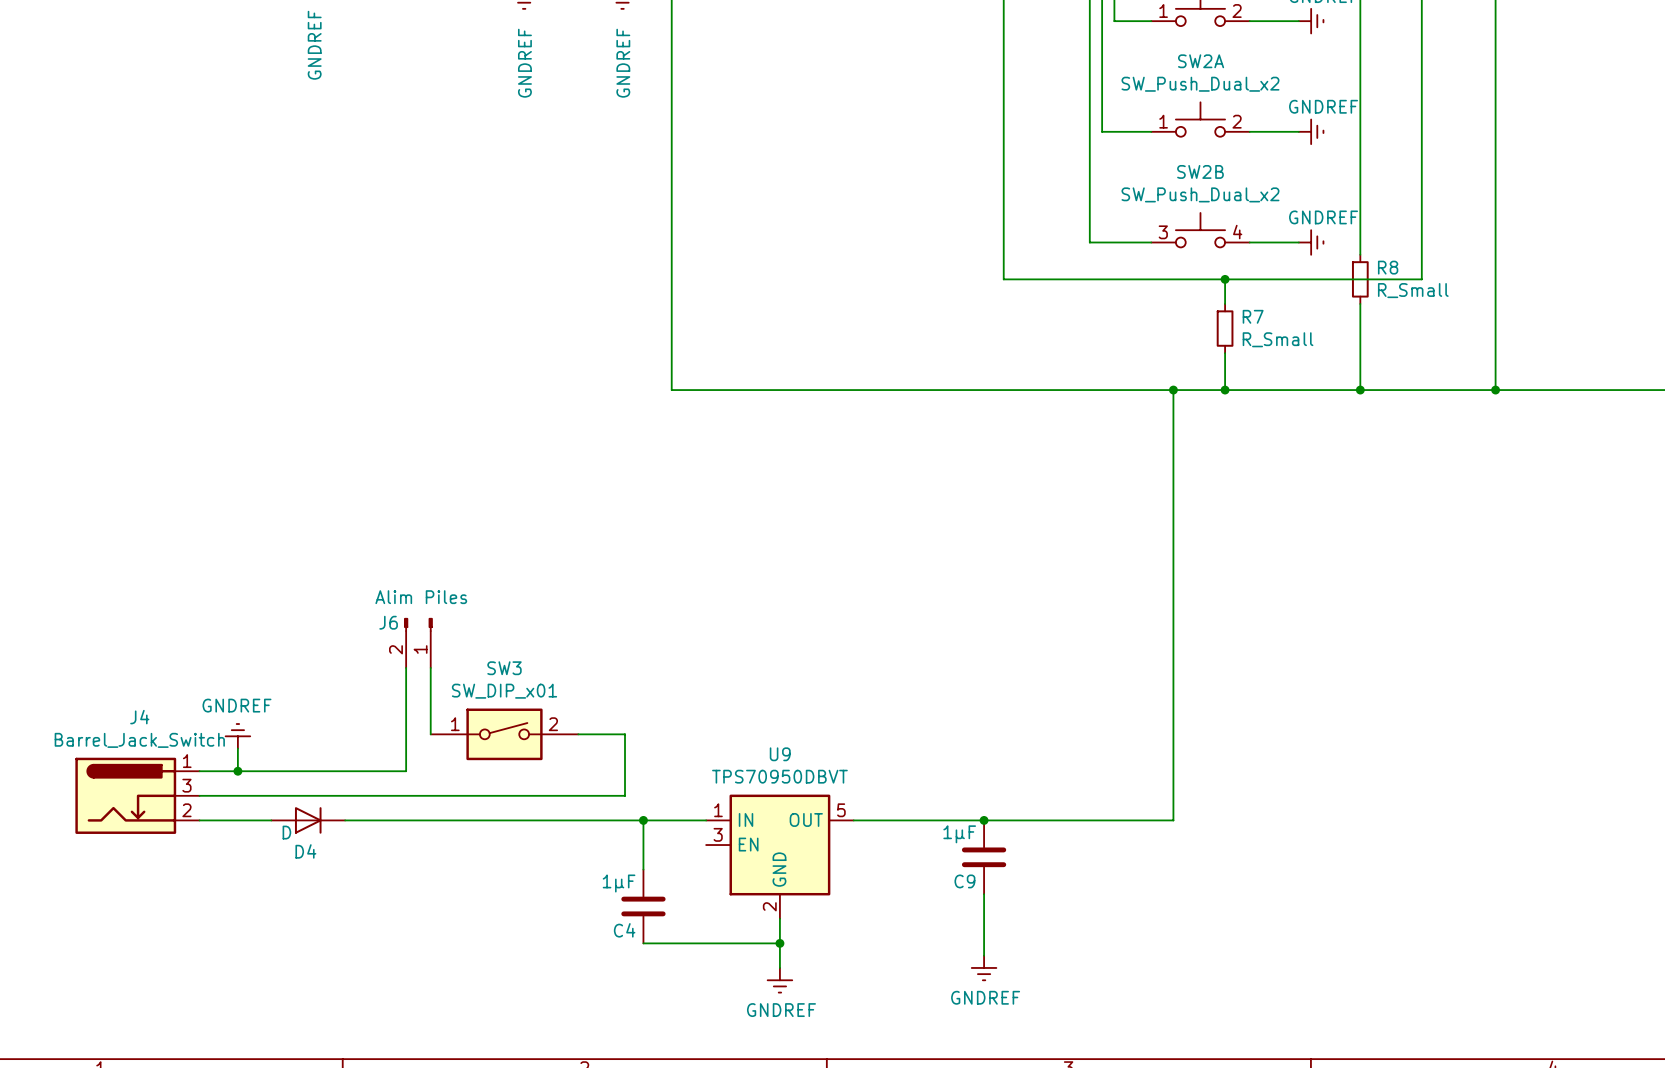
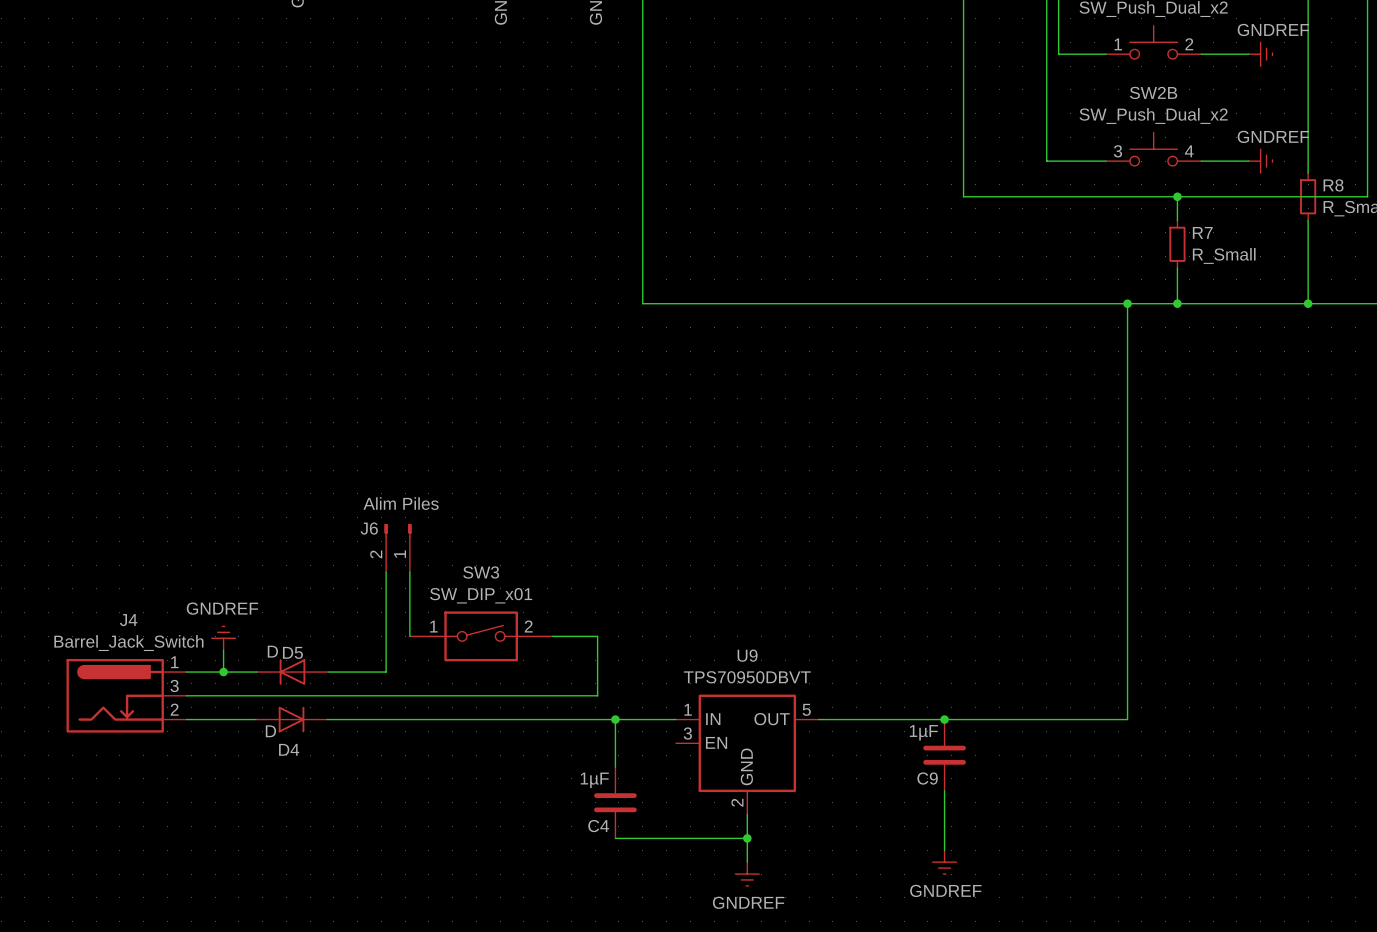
D5: none -> D (292, 672)

